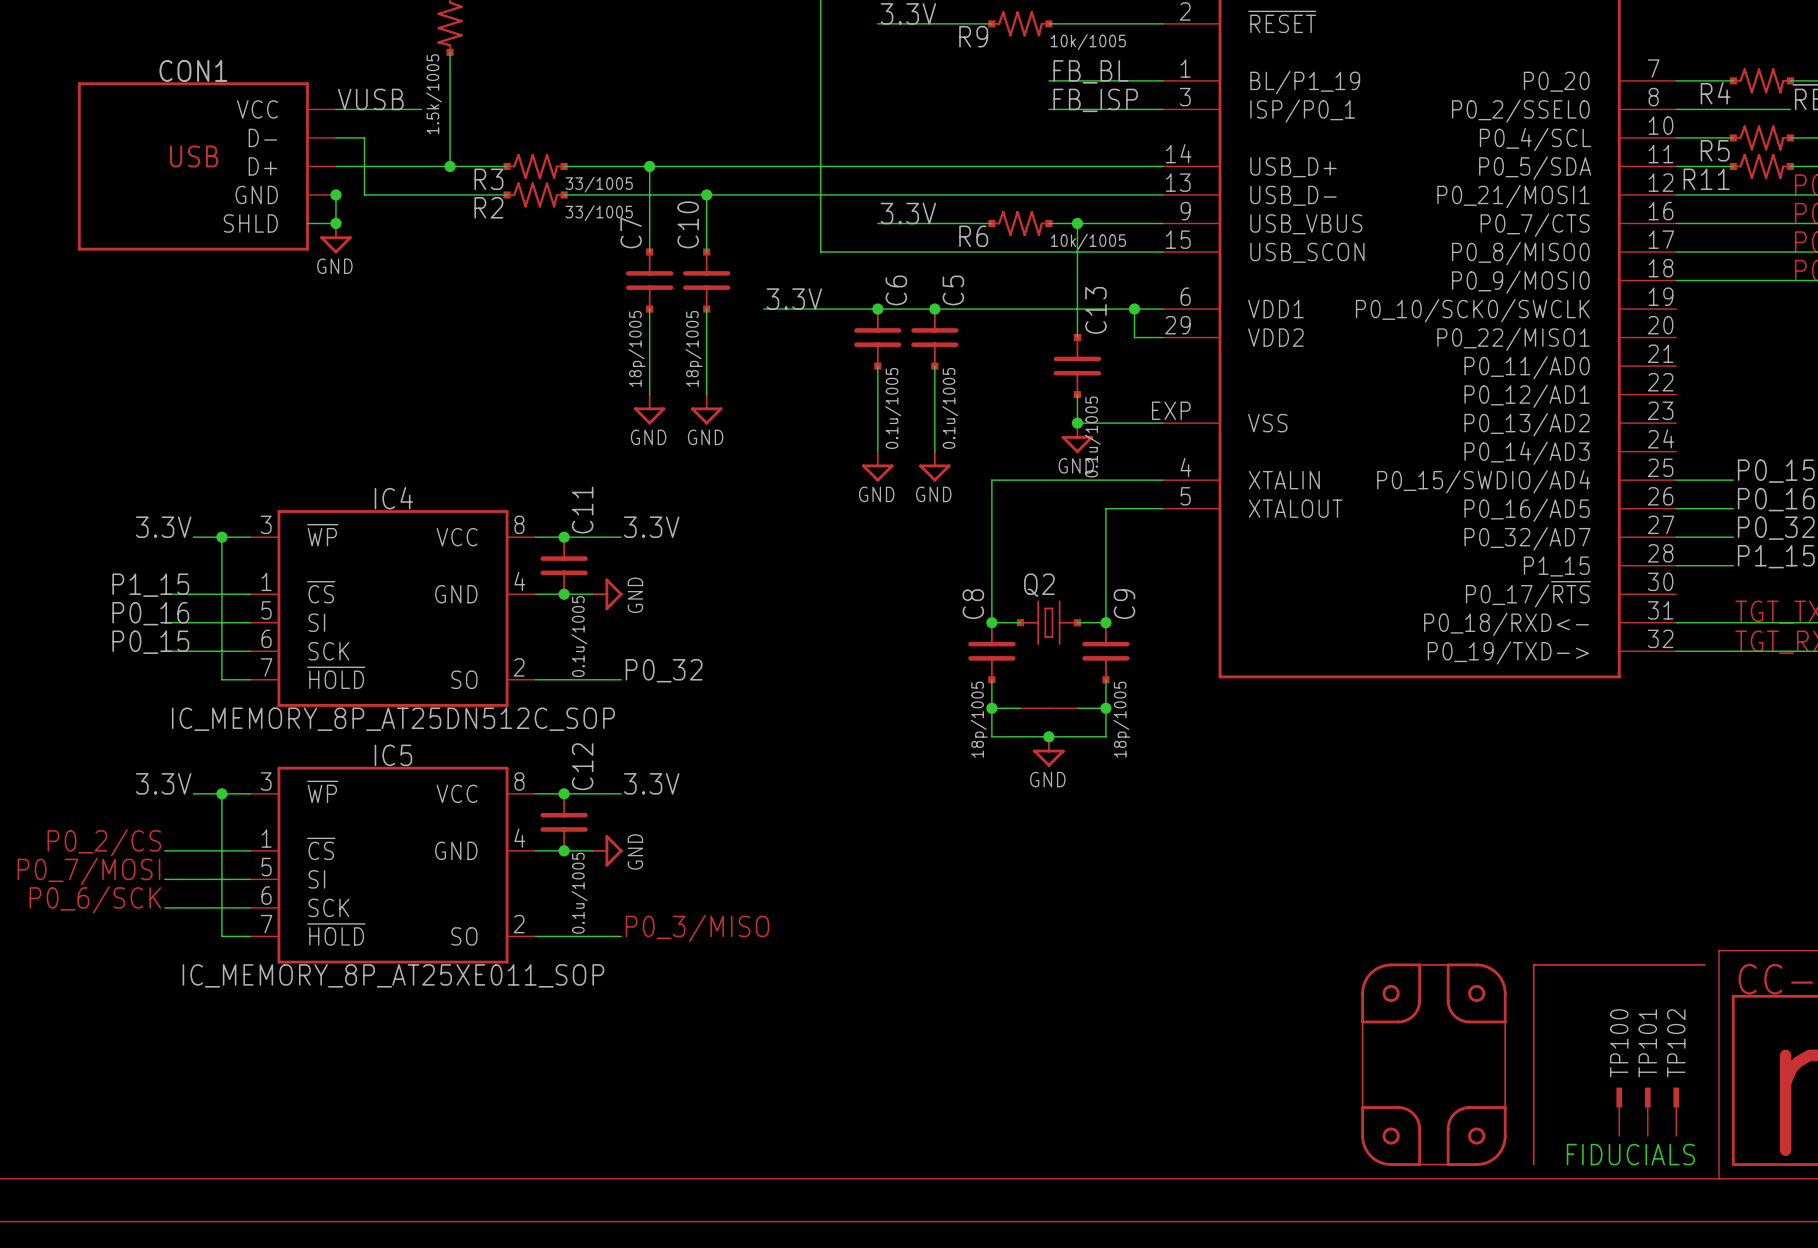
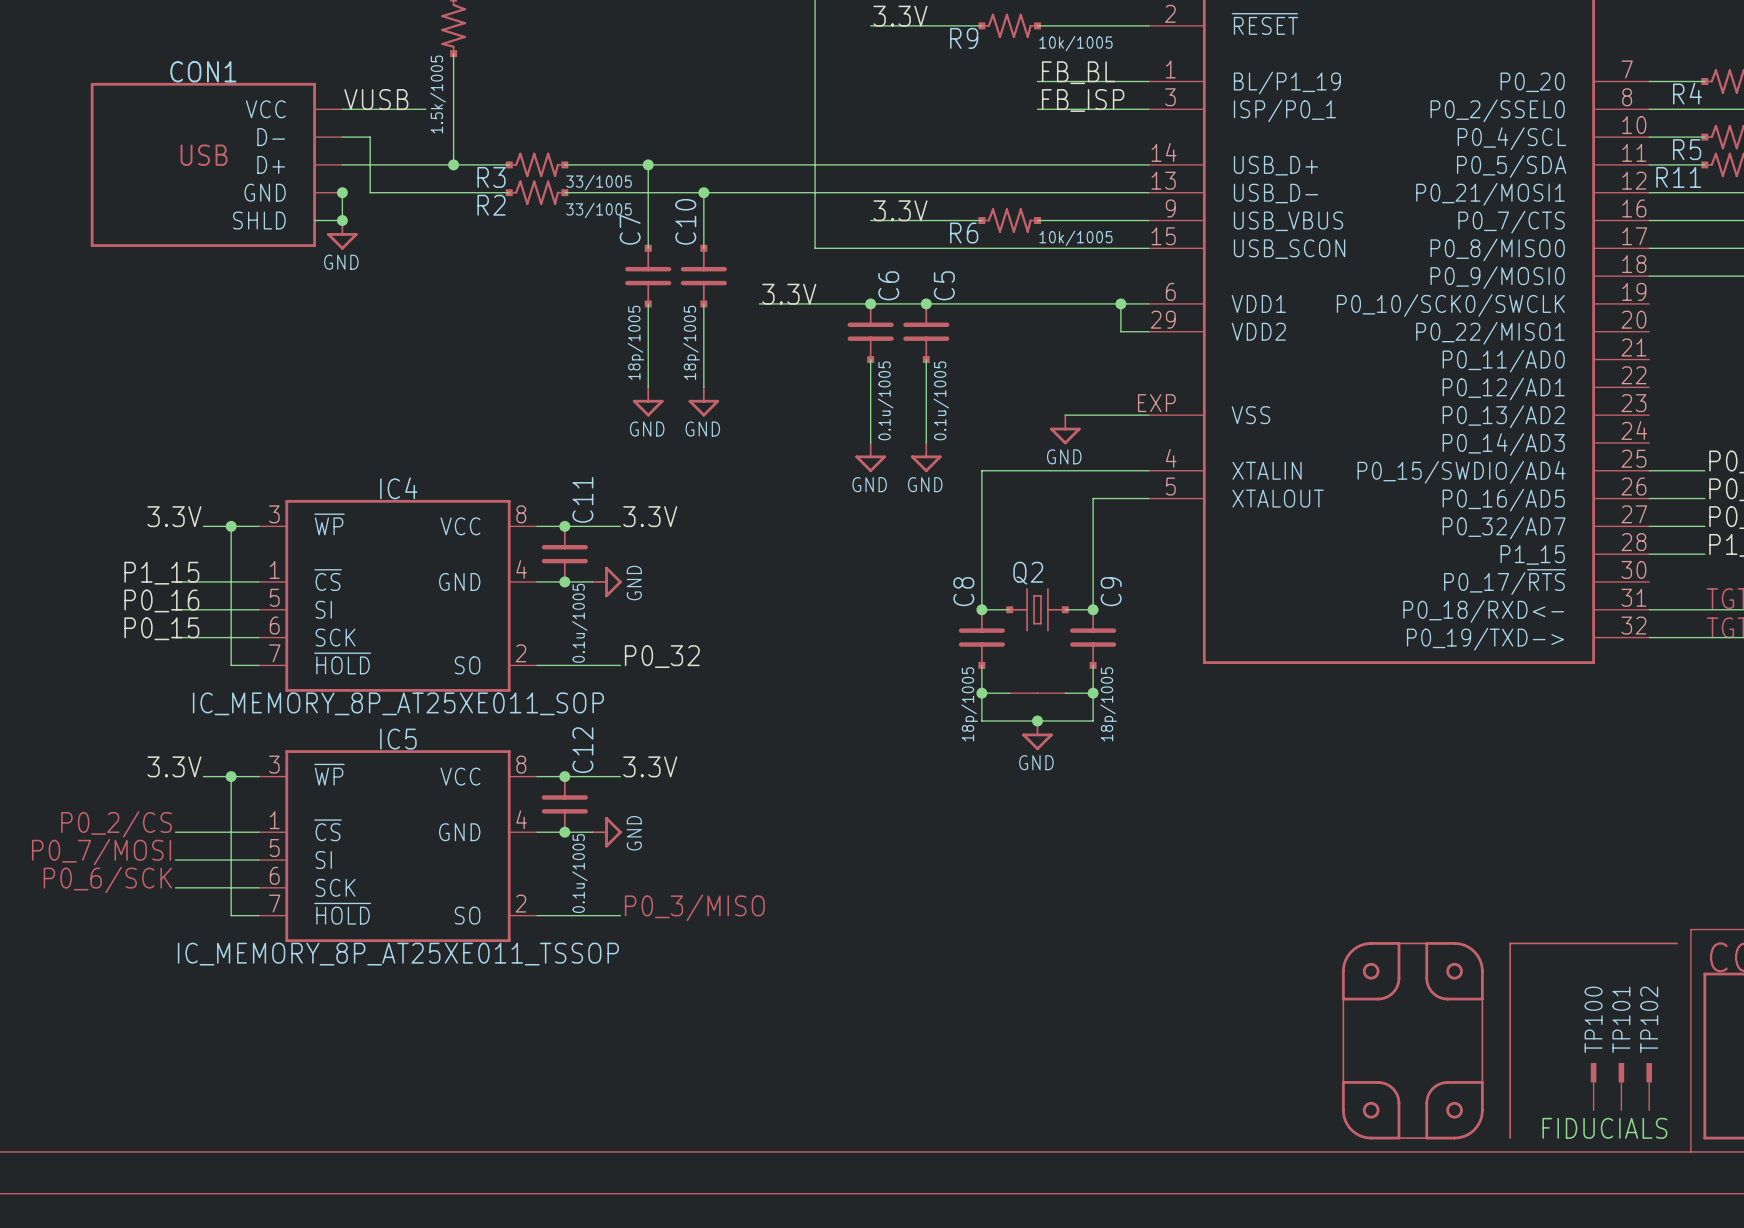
wire: (1077, 223) (1077, 337) -> none
junction: (1077, 223) -> none
C13: 0.1u/1005 (1077, 366) -> none
wire: (1077, 394) (1077, 423) -> none
junction: (1077, 423) -> none
IC4 value: IC_MEMORY_8P_AT25DN512C_SOP (393, 719) -> IC_MEMORY_8P_AT25XE011_SOP (398, 703)
IC5 value: IC_MEMORY_8P_AT25XE011_SOP (393, 975) -> IC_MEMORY_8P_AT25XE011_TSSOP (398, 954)

